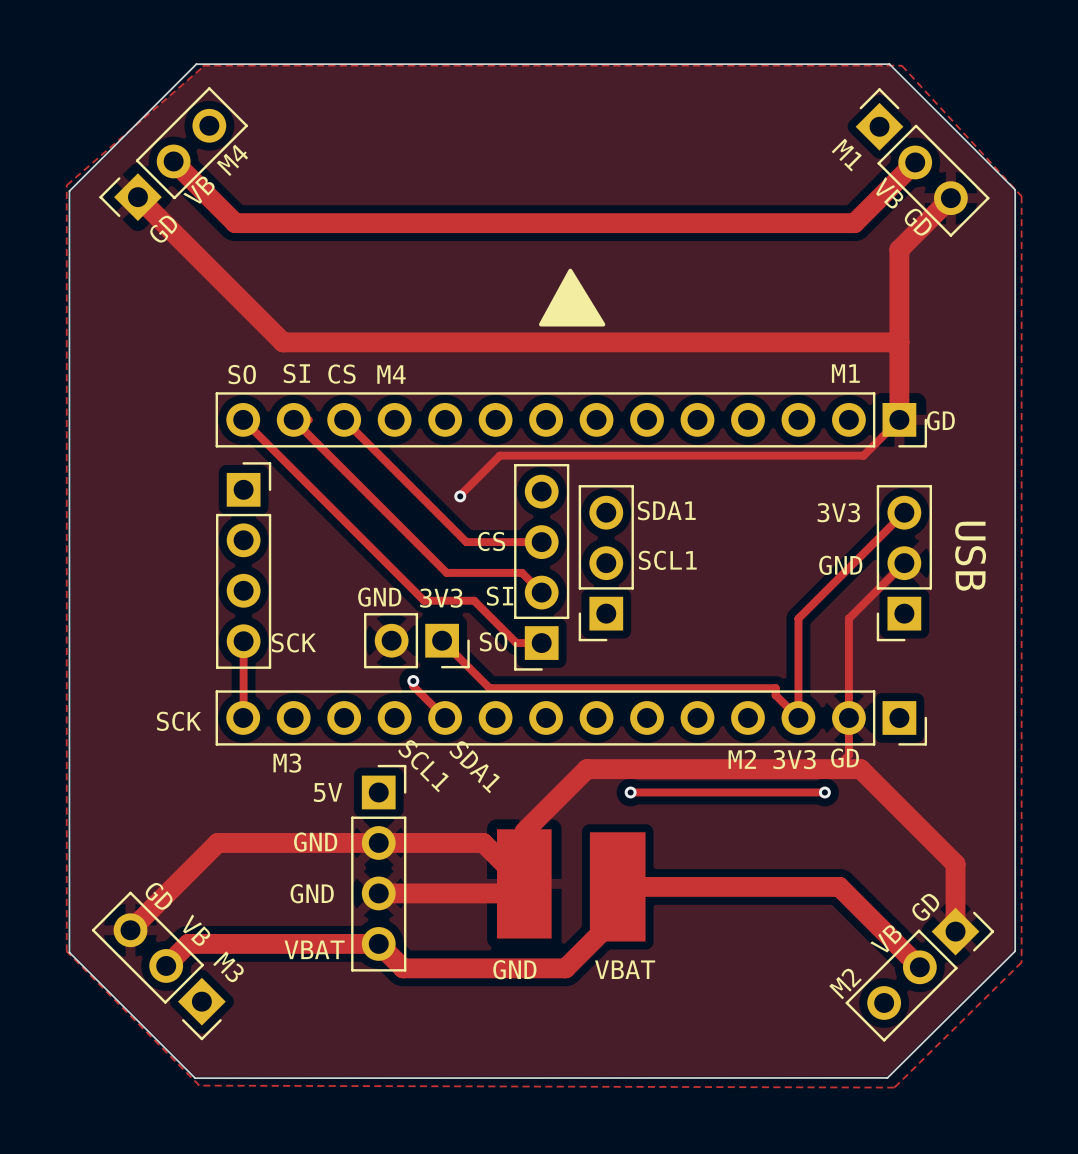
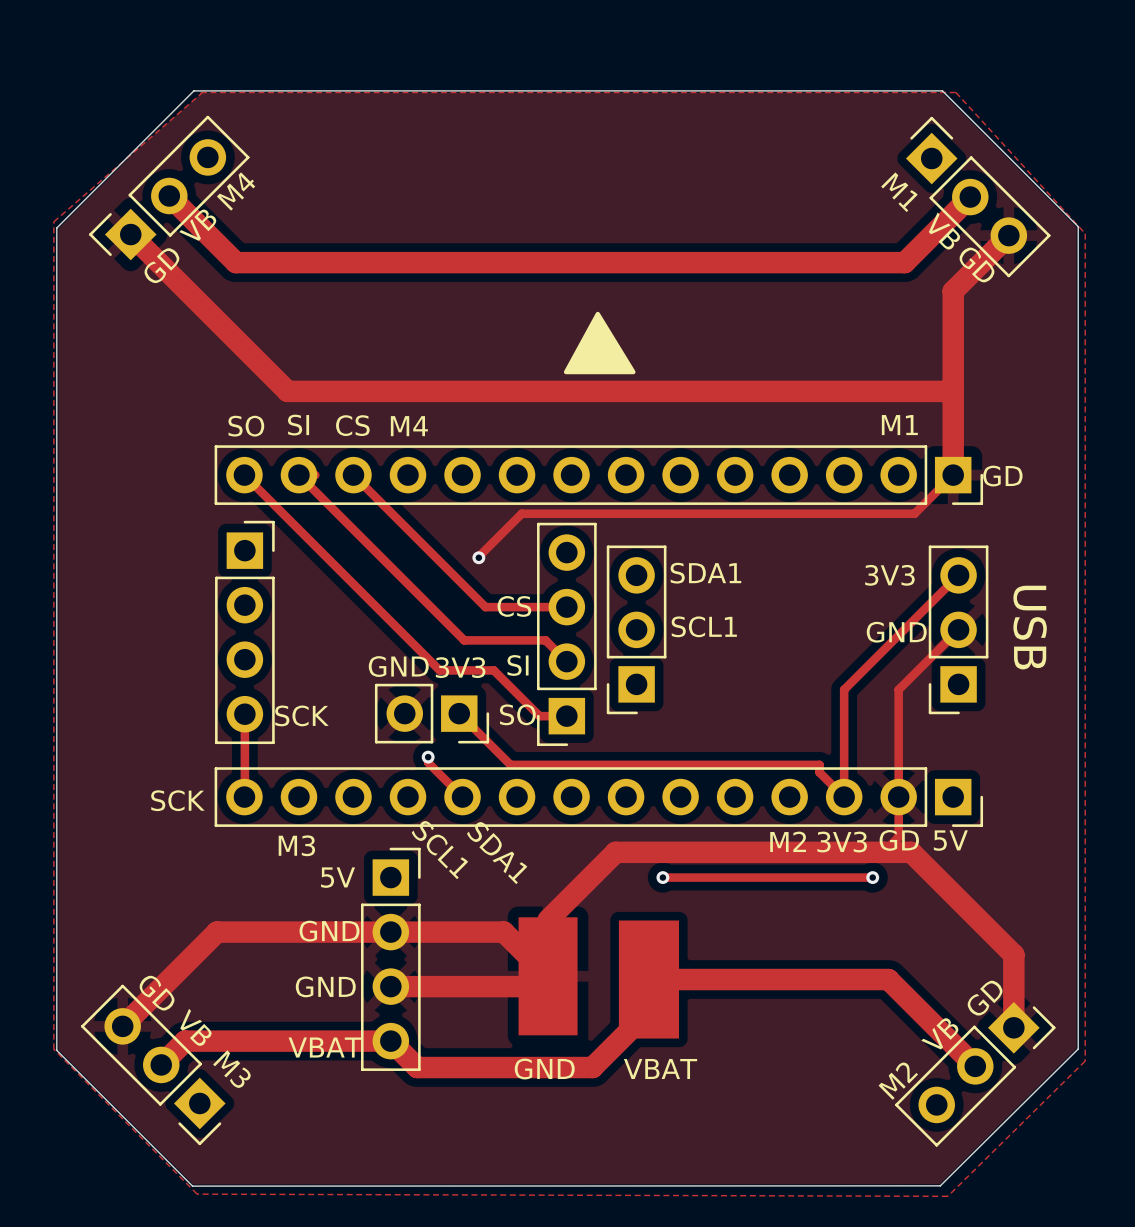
text: none -> 5V (950, 840)

